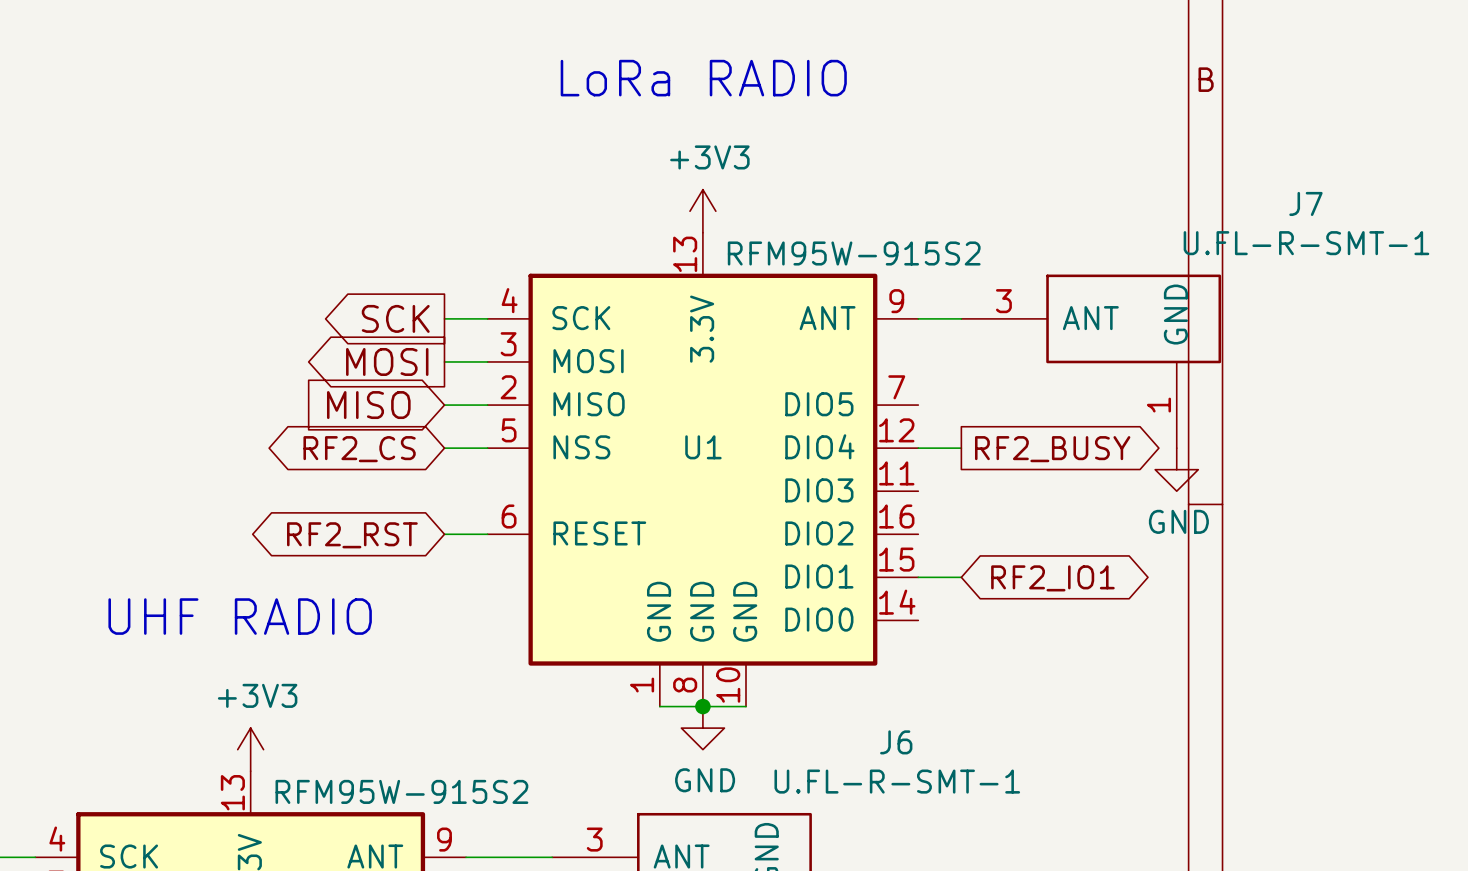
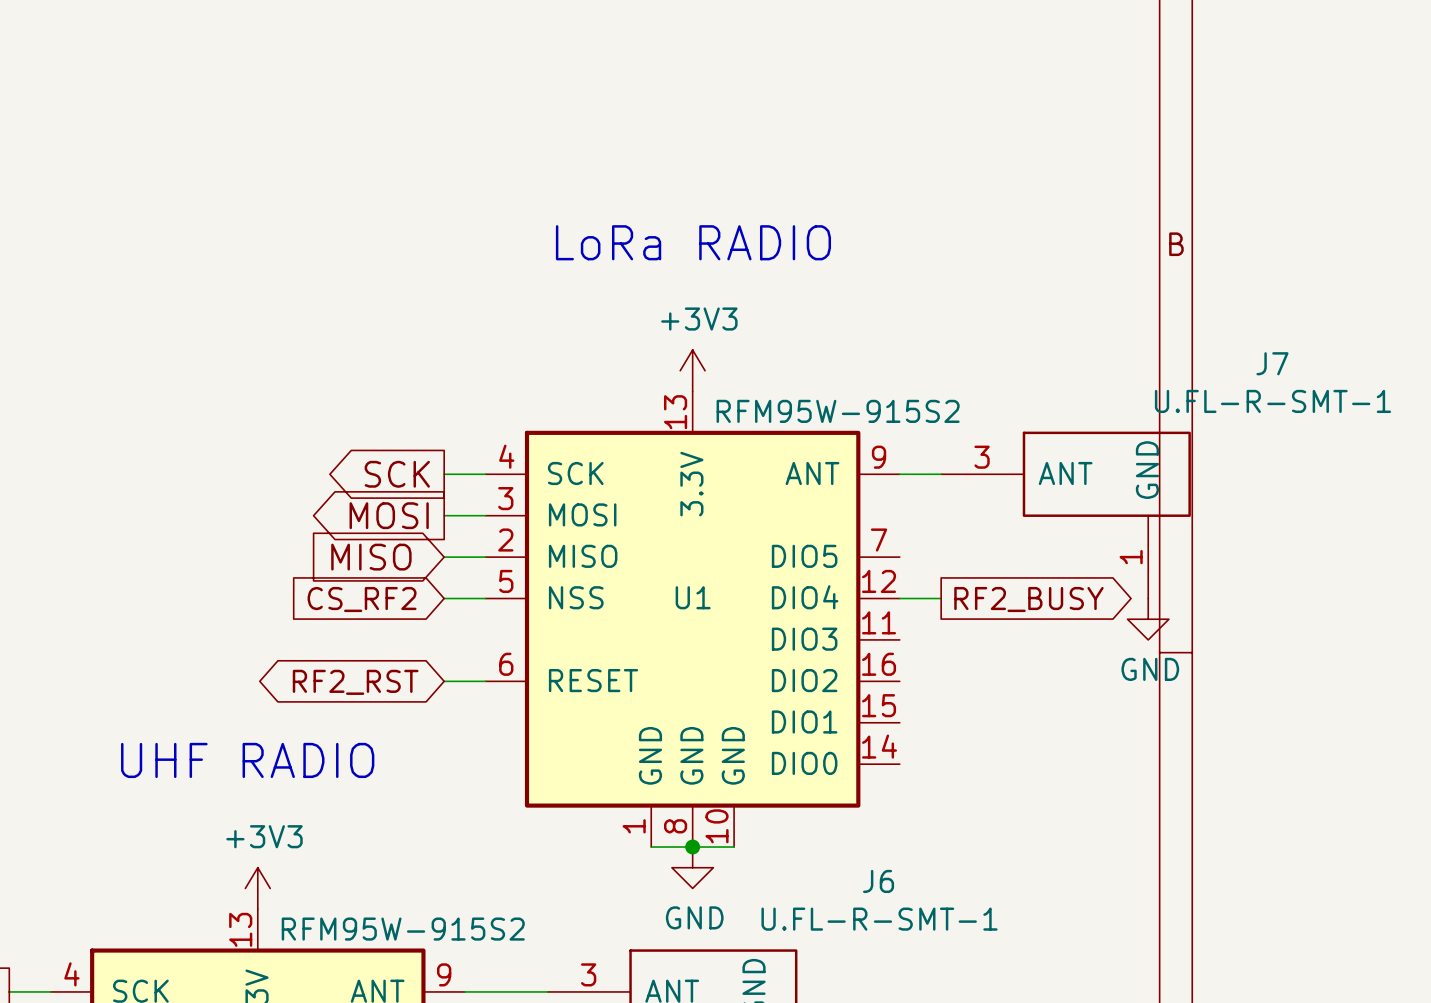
global label shape: bidirectional (359, 449) -> input (362, 599)
global label: RF2_CS (359, 449) -> CS_RF2 (362, 599)
wire: (918, 577) (961, 577) -> none
global label: RF2_IO1 (1052, 578) -> none

